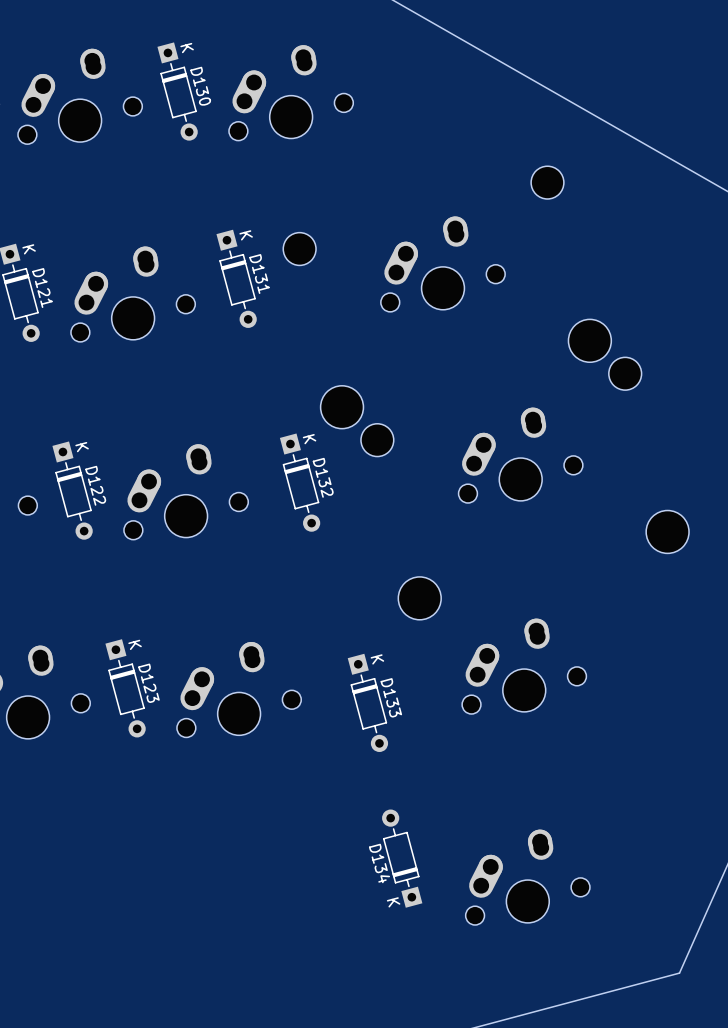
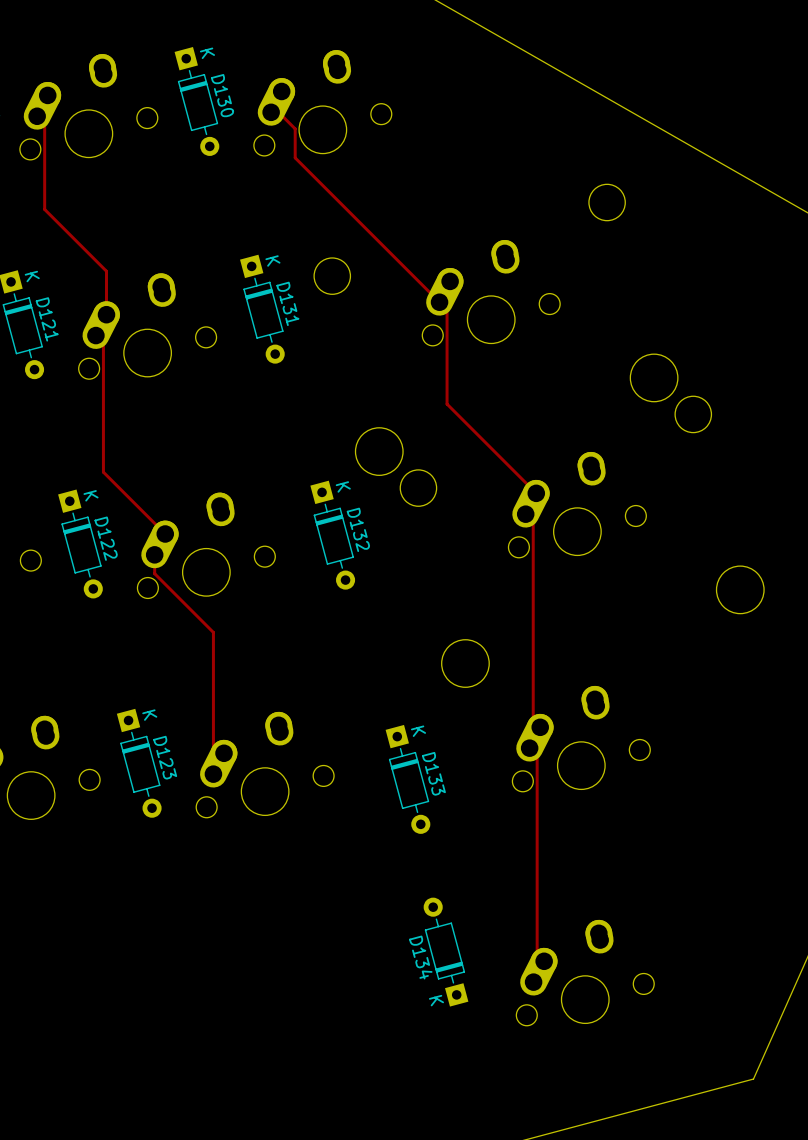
track: none -> (271, 112) (278, 112) (295, 128) (295, 157) (447, 309) (447, 404) (536, 493)
track: none -> (37, 116) (44, 123) (44, 209) (106, 271) (106, 314)
track: none -> (95, 335) (103, 343) (103, 472) (165, 533)
track: none -> (525, 514) (533, 521) (533, 720) (540, 727)
track: none -> (154, 554) (154, 573) (213, 632) (213, 774)
track: none -> (529, 748) (537, 755) (537, 978) (533, 982)

